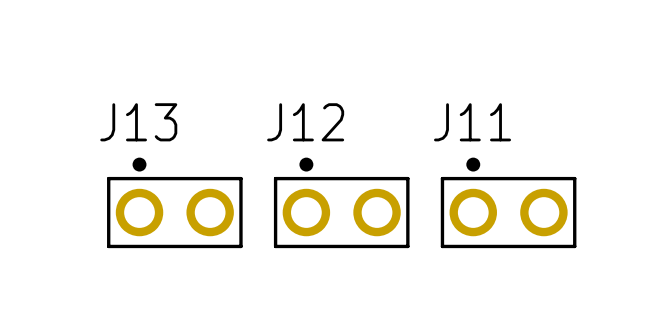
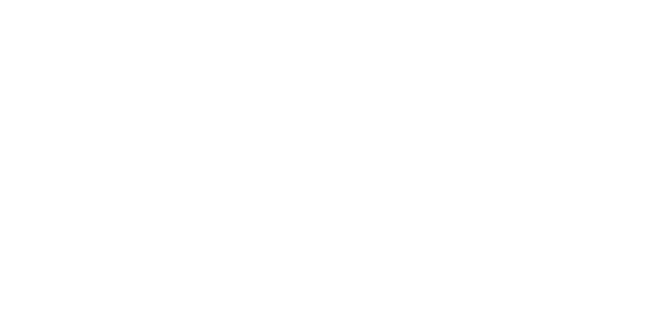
J13: (174, 202) -> none
J12: (341, 202) -> none
J11: (508, 202) -> none

